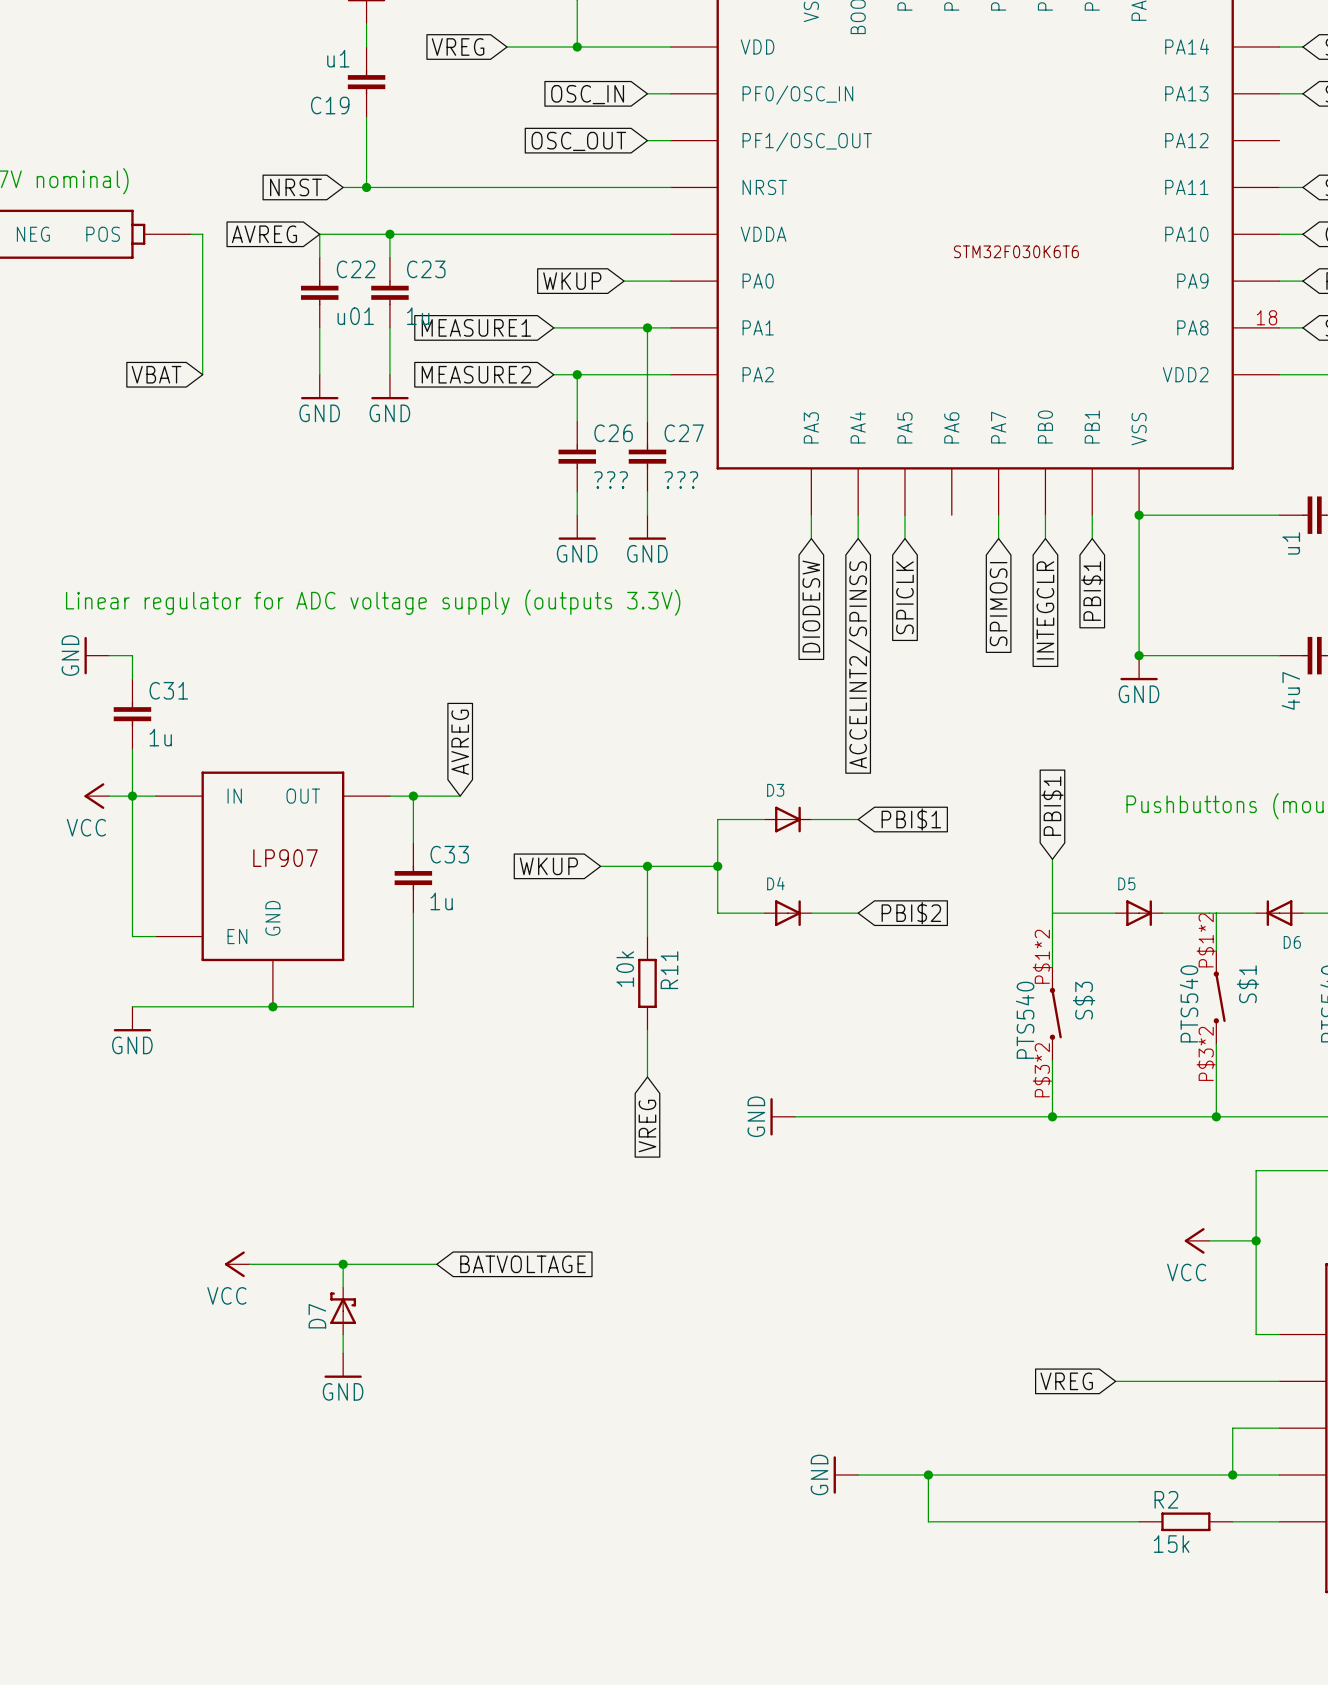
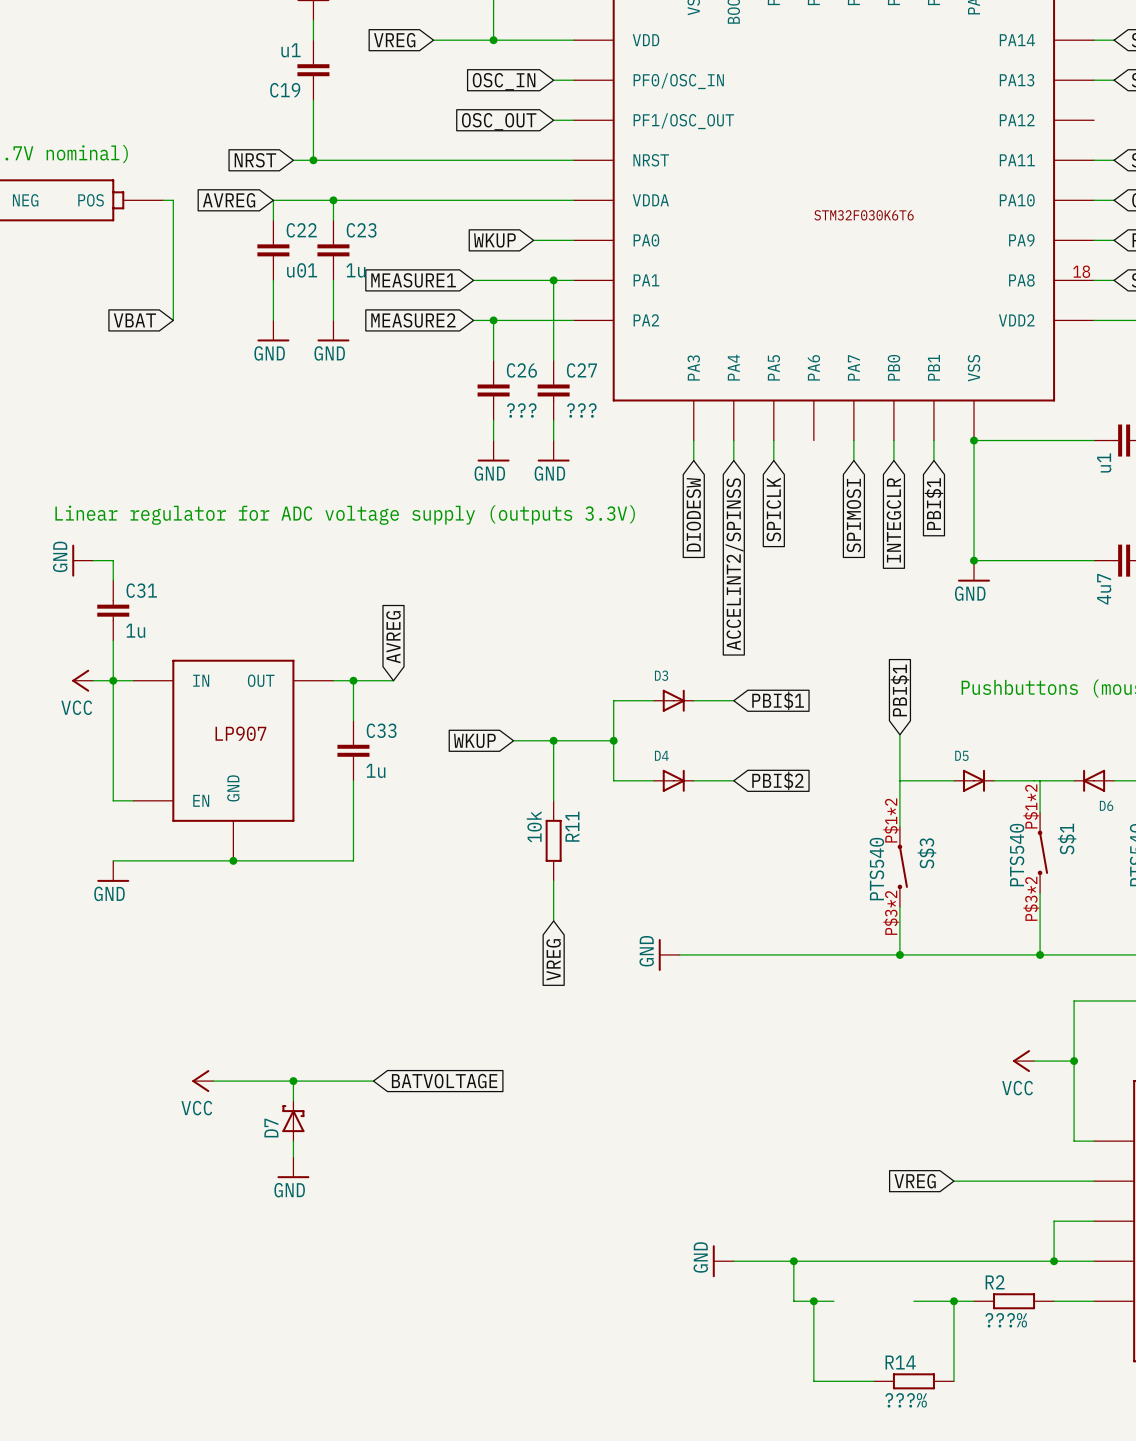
wire: none -> (813, 1301) (813, 1381) (873, 1381)
junction: none -> (813, 1301)
wire: (975, 1521) (1068, 1521) -> none
wire: none -> (953, 1301) (953, 1381)
junction: none -> (953, 1301)
R2 value: 15k (1171, 1544) -> ???% (1006, 1320)
R14: none -> ???% (913, 1381)

